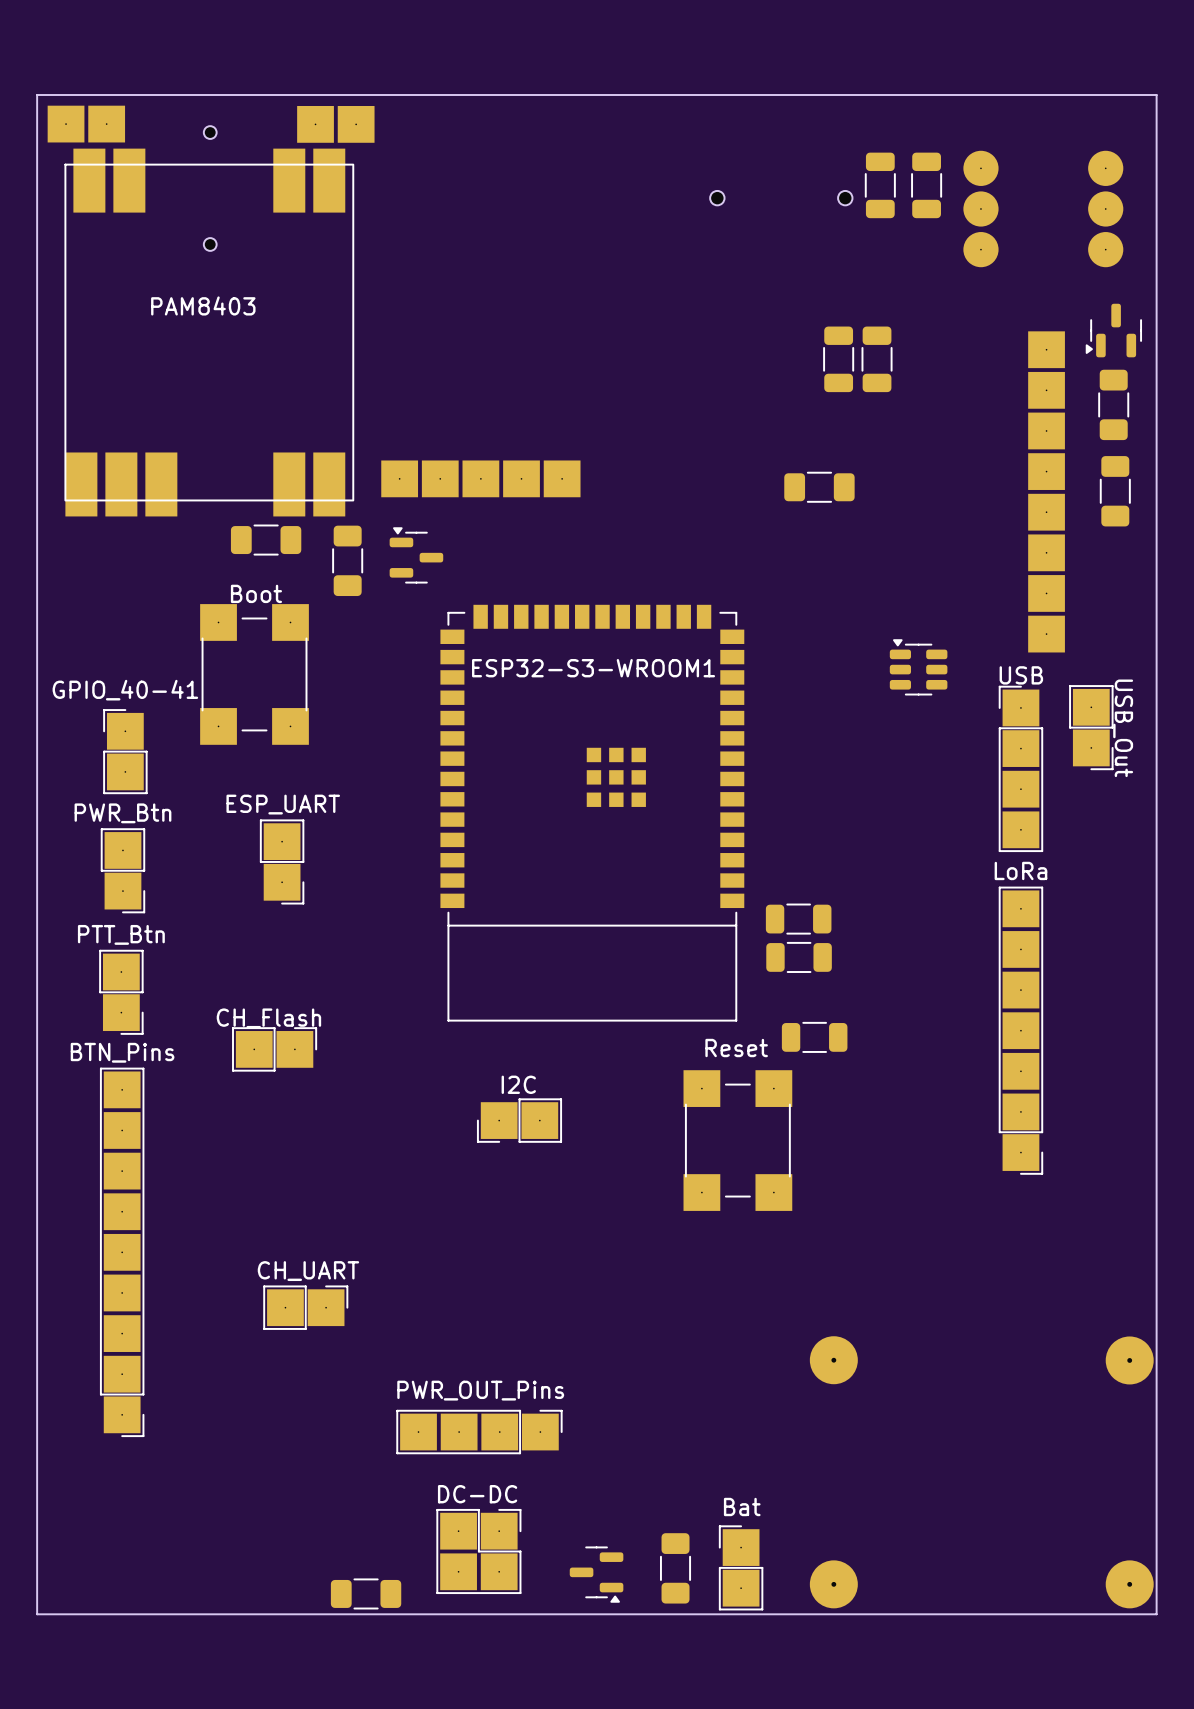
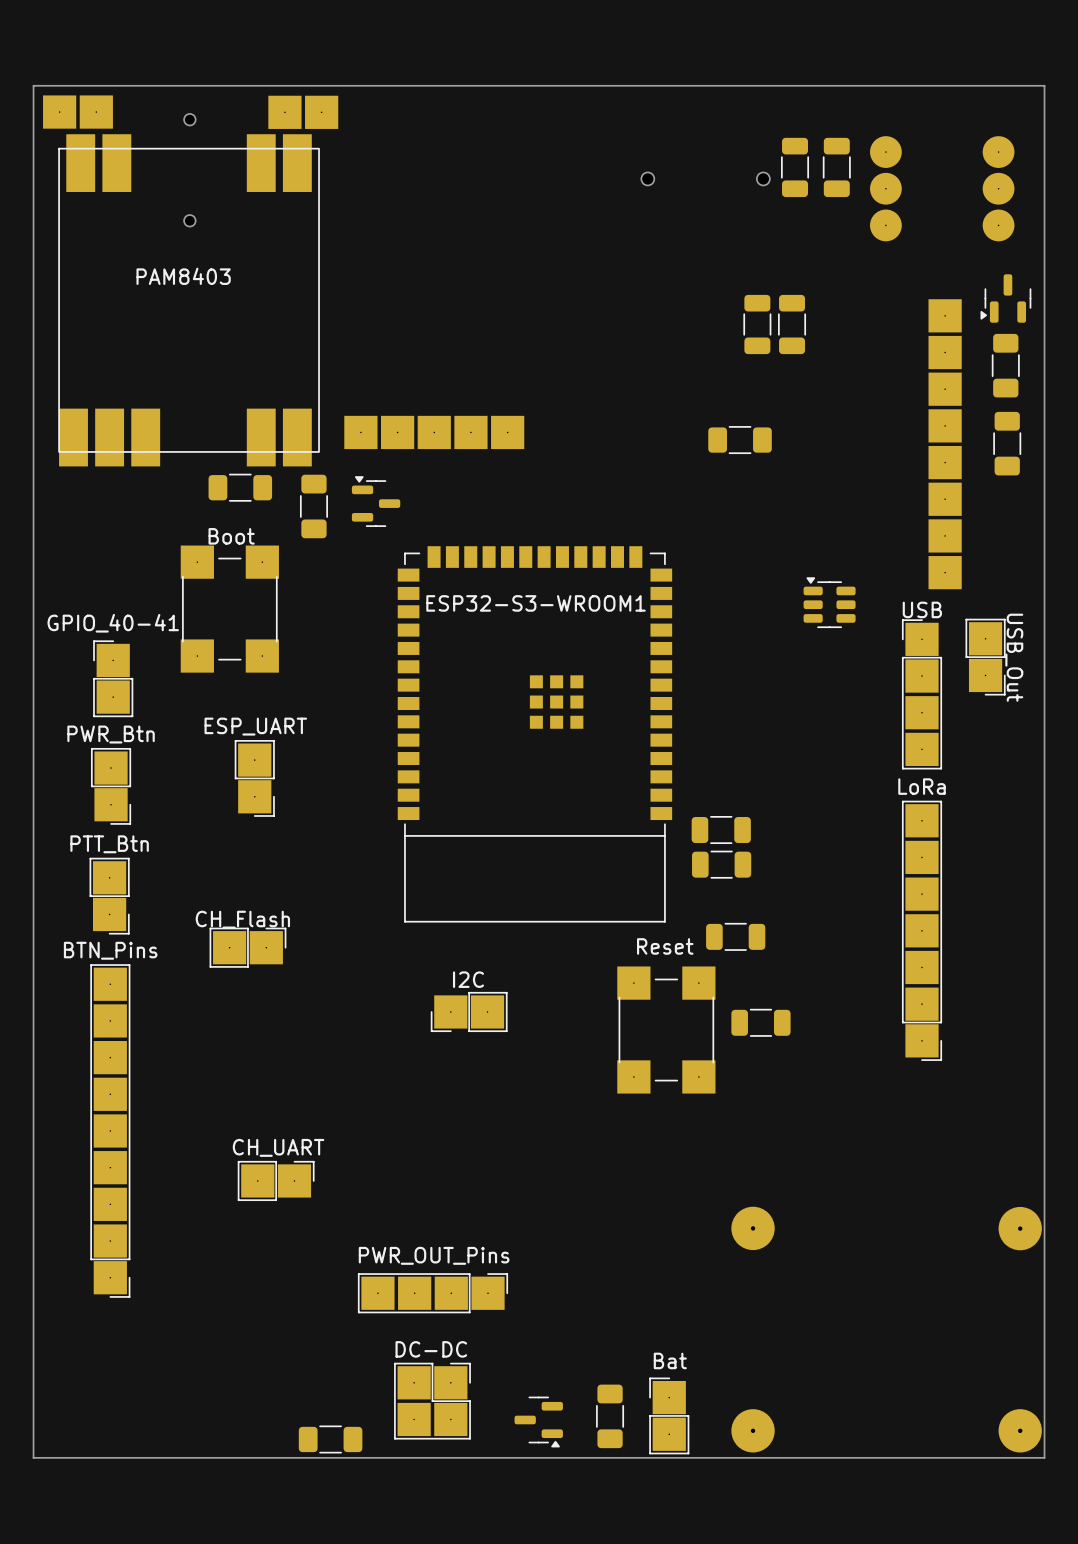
part: none -> (760, 1022)

